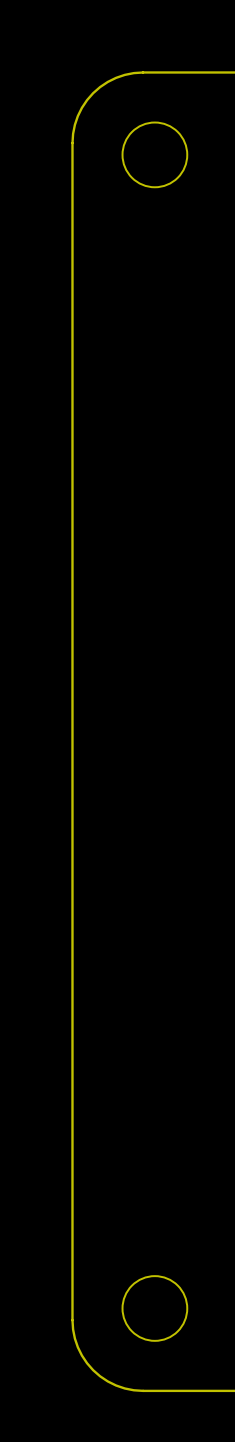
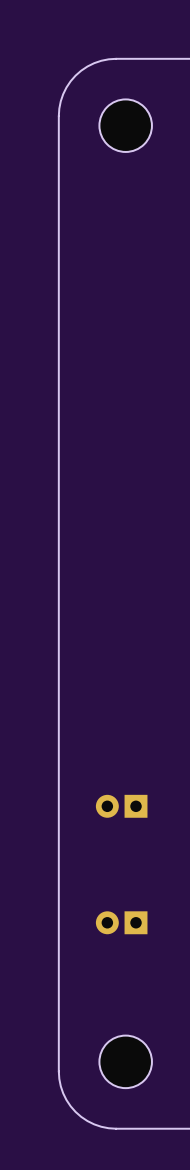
part: none -> (121, 806)
part: none -> (121, 922)

